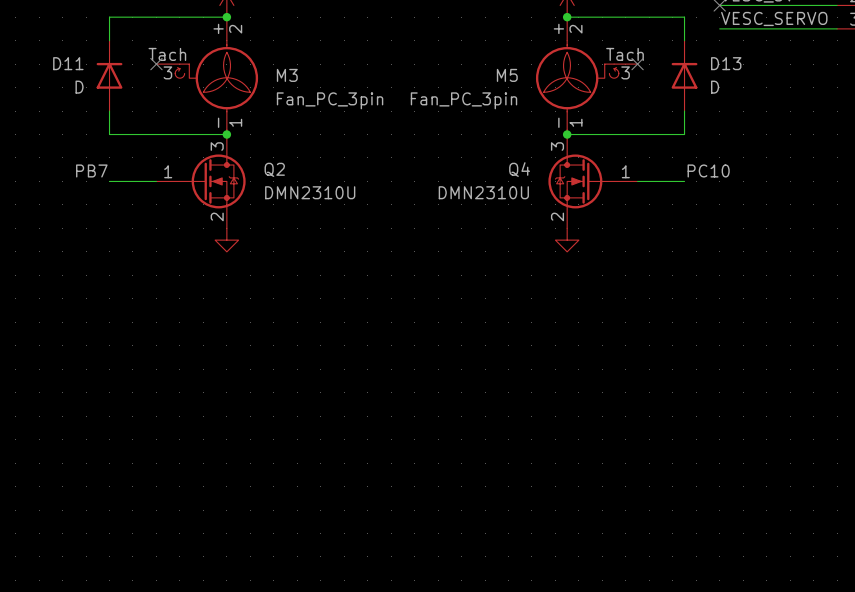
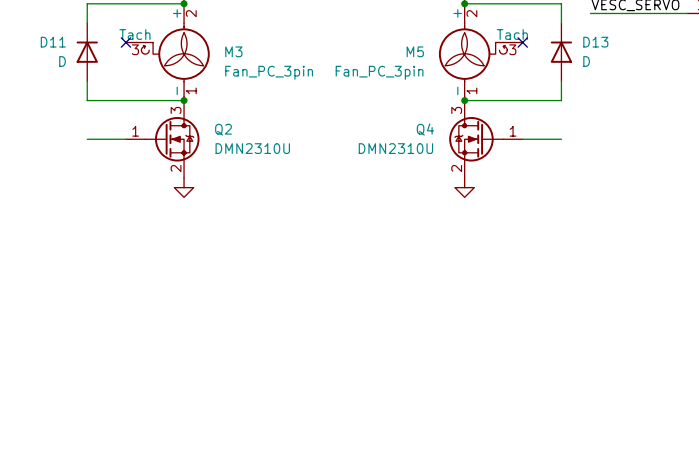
label: PB7 (91, 170) -> none
label: PC10 (708, 170) -> none

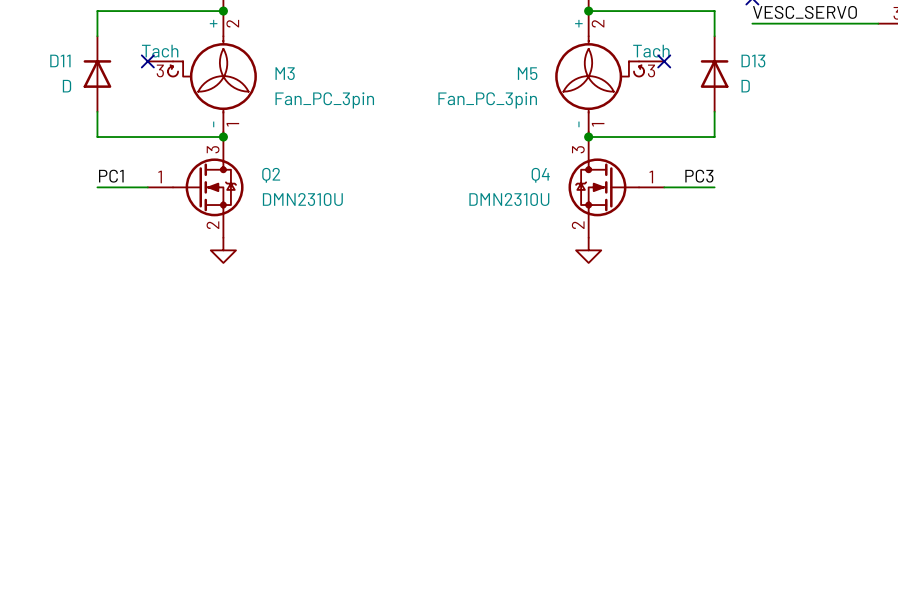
label: none -> PC1 (111, 176)
label: none -> PC3 (699, 176)

